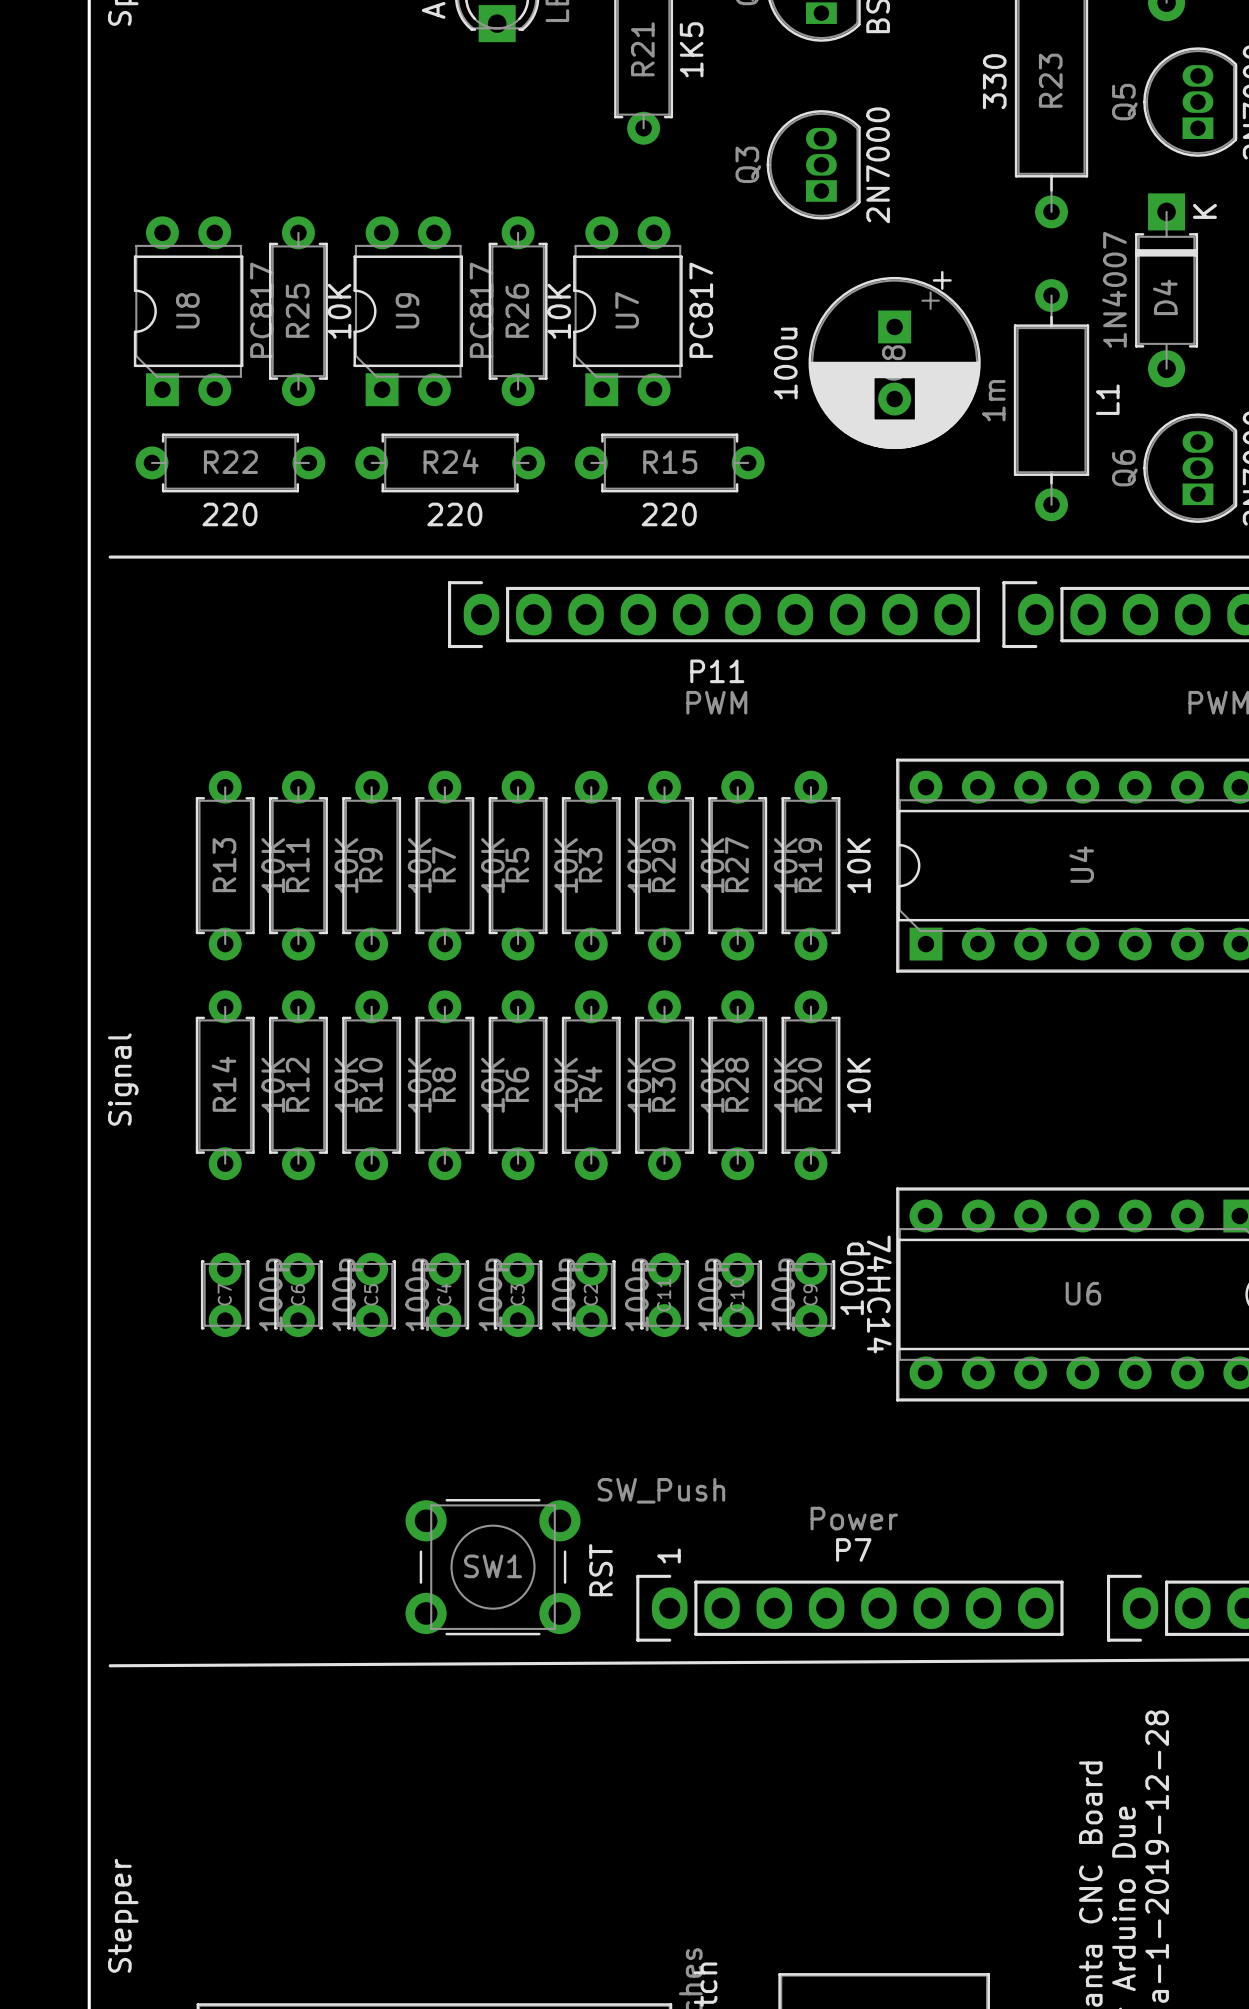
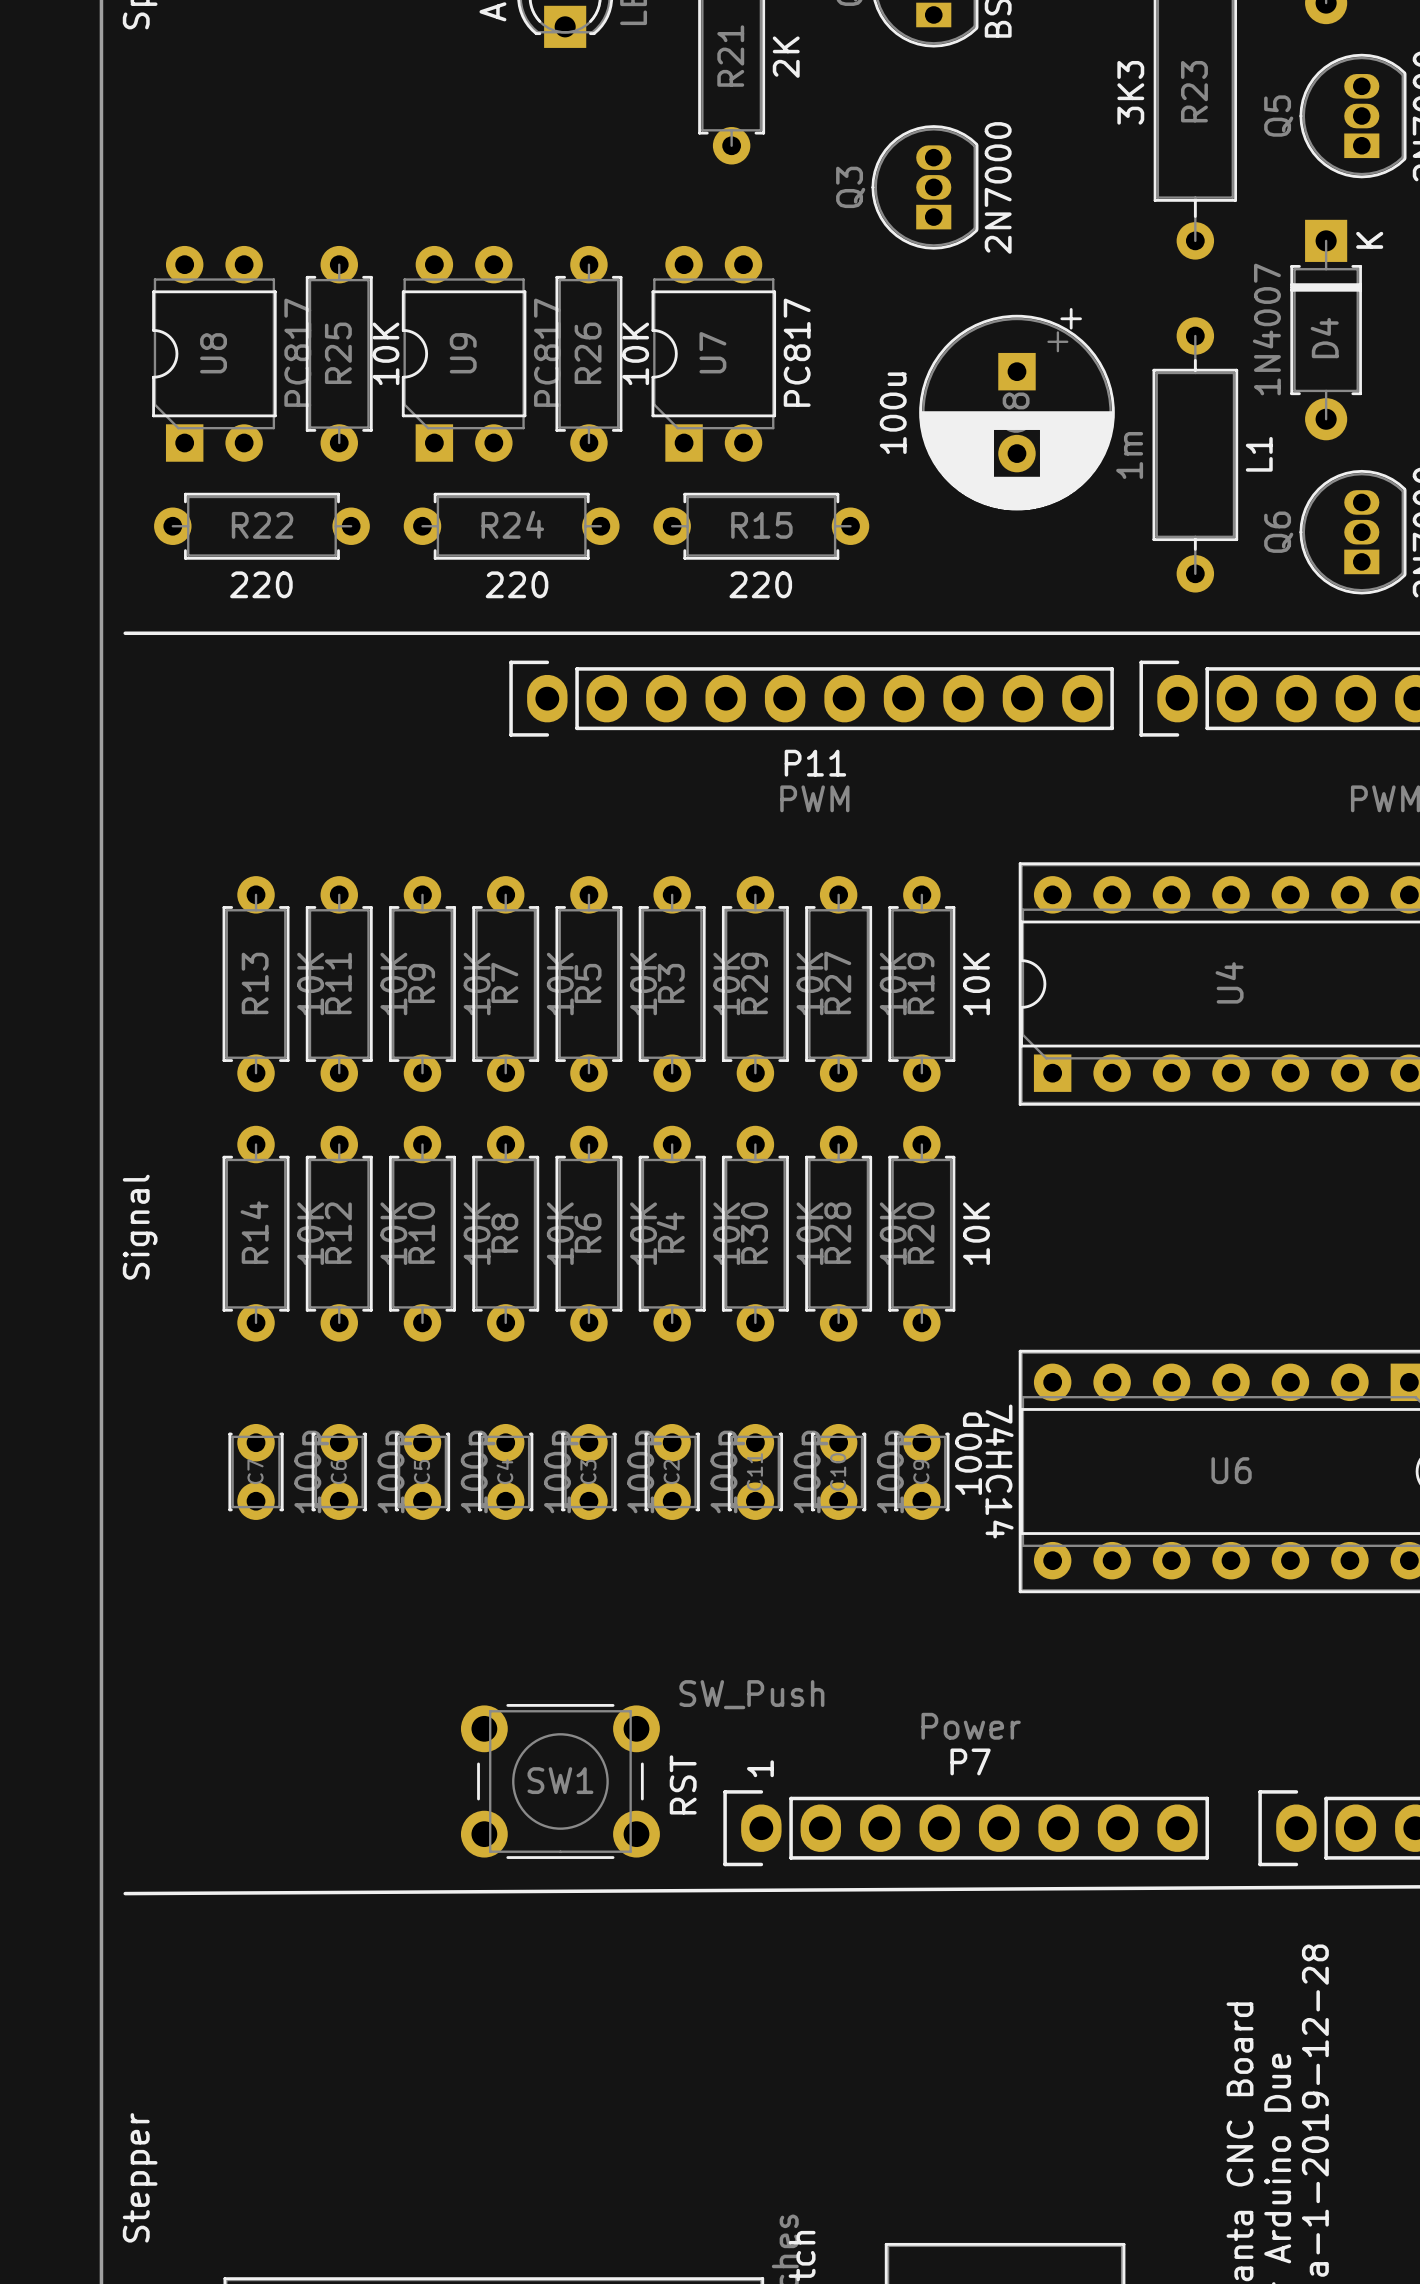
R21 value: 1K5 (691, 49) -> 2K (786, 57)
R23 value: 330 (994, 81) -> 3K3 (1130, 92)

